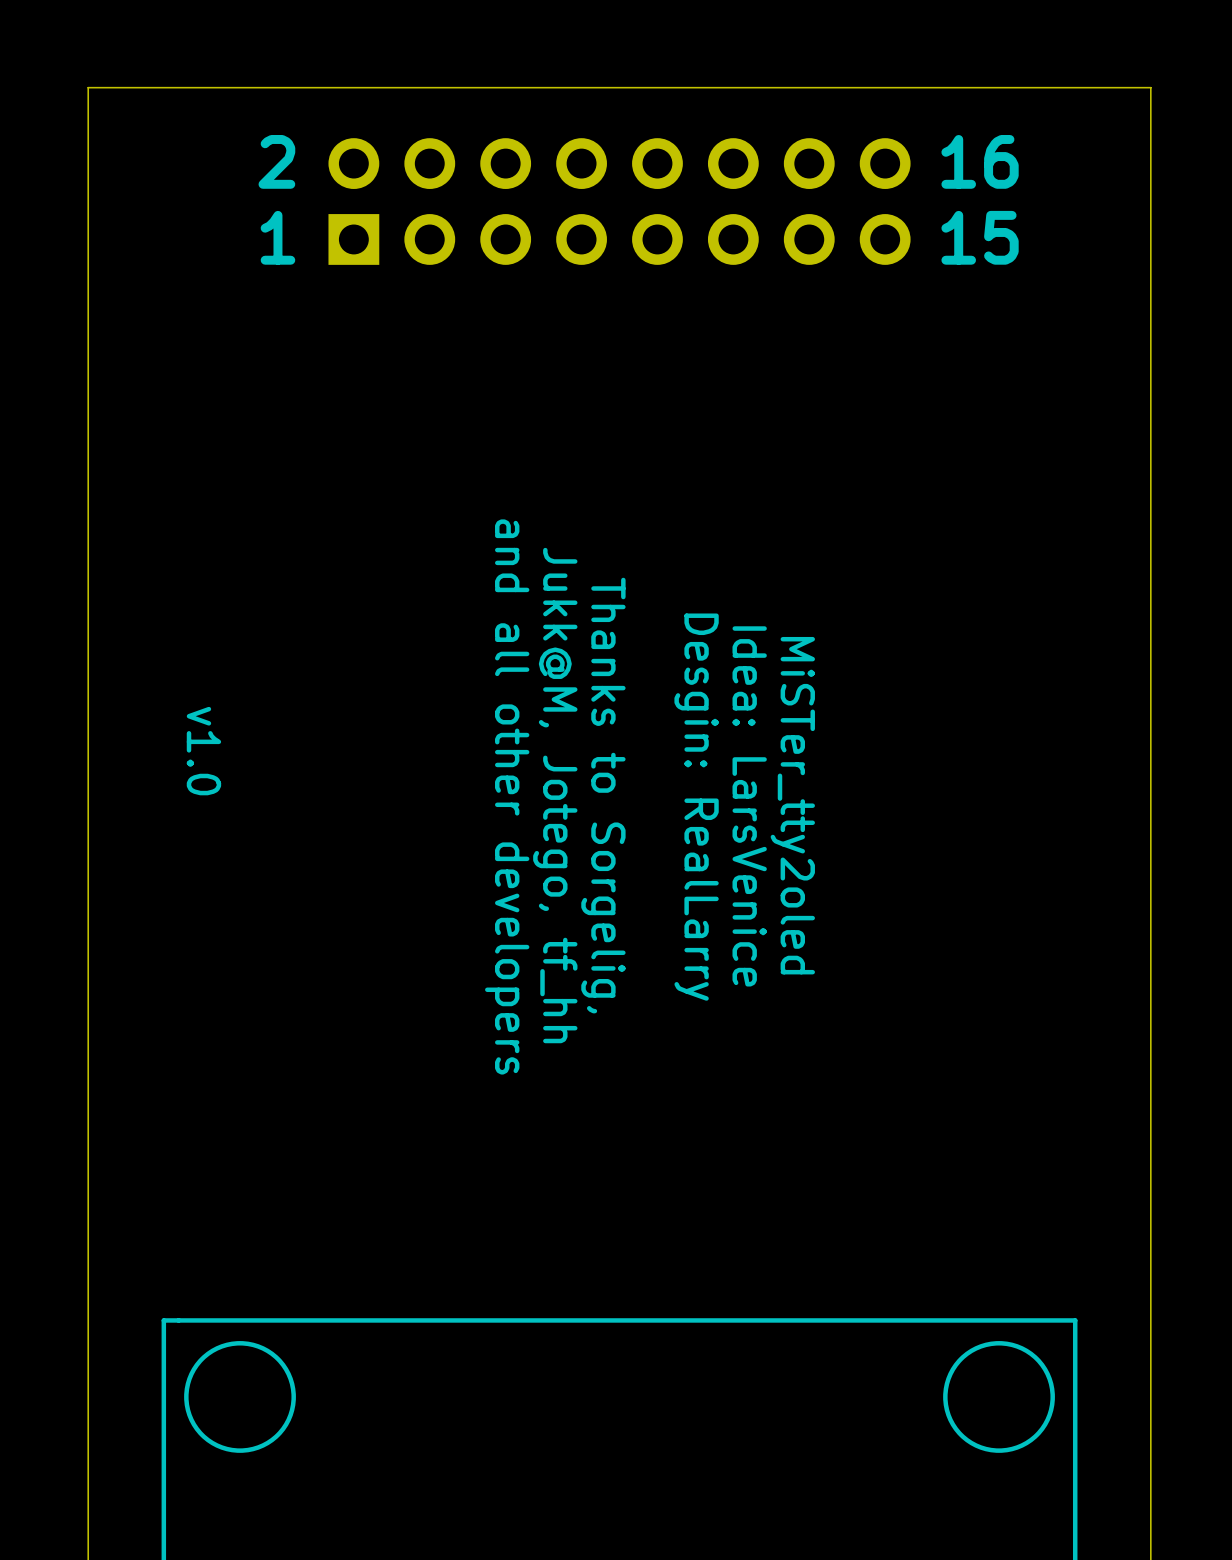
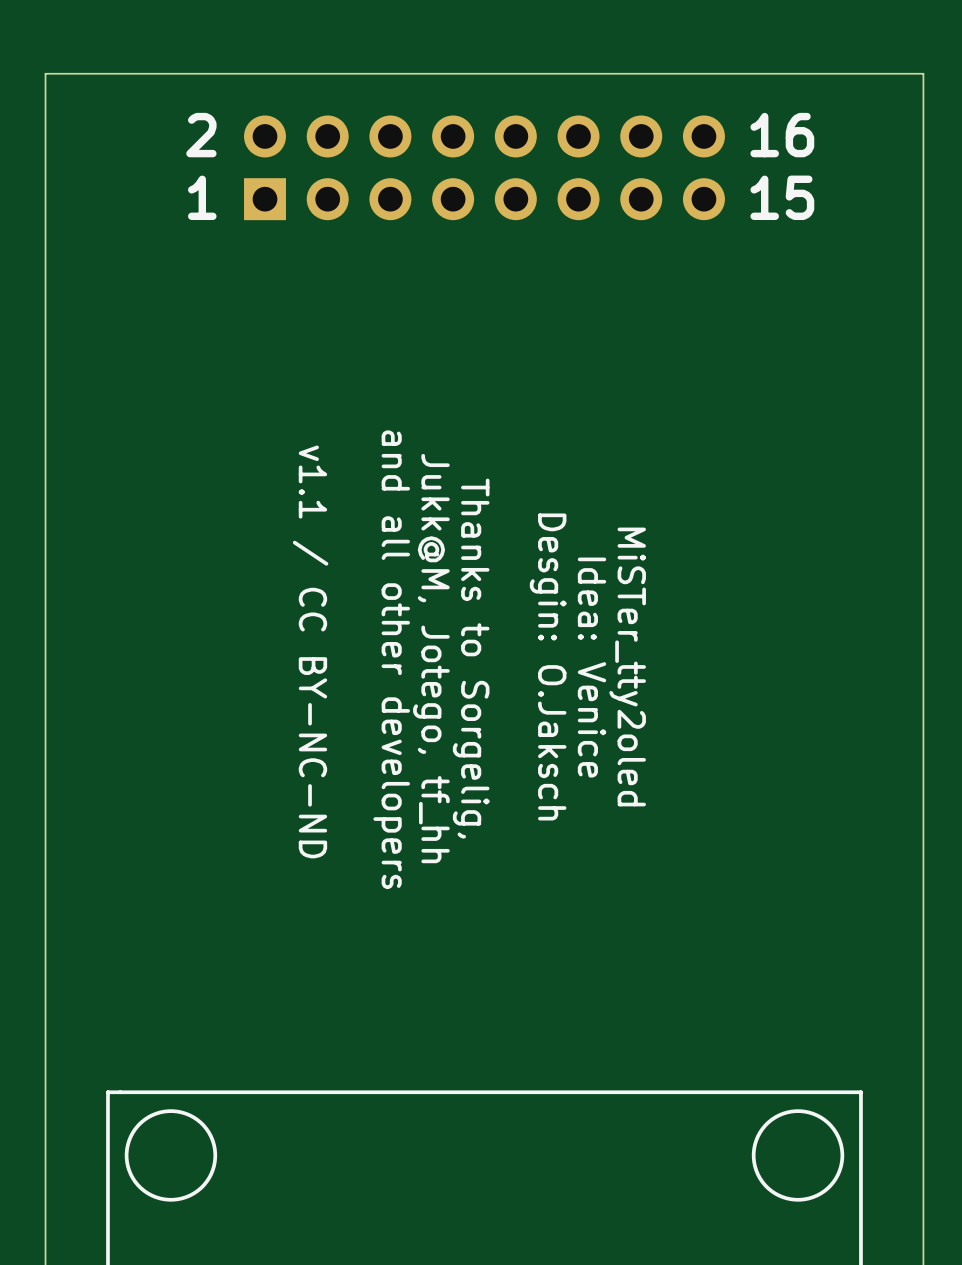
text: v1.0 (203, 751) -> none
text: none -> v1.1 / CC BY-NC-ND (310, 651)
text: Idea: LarsVenice (749, 806) -> Idea: Venice (592, 667)
text: Desgin: RealLarry (696, 807) -> Desgin: O.Jaksch (548, 666)

